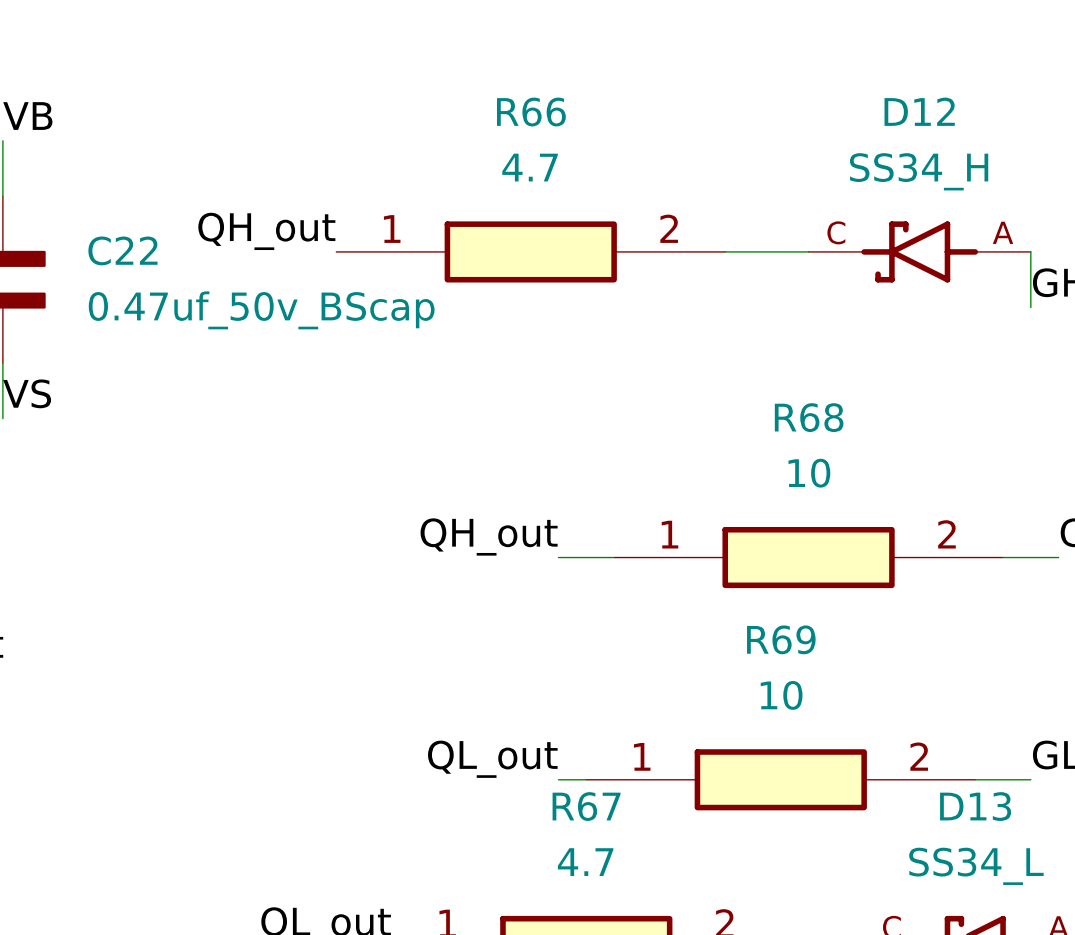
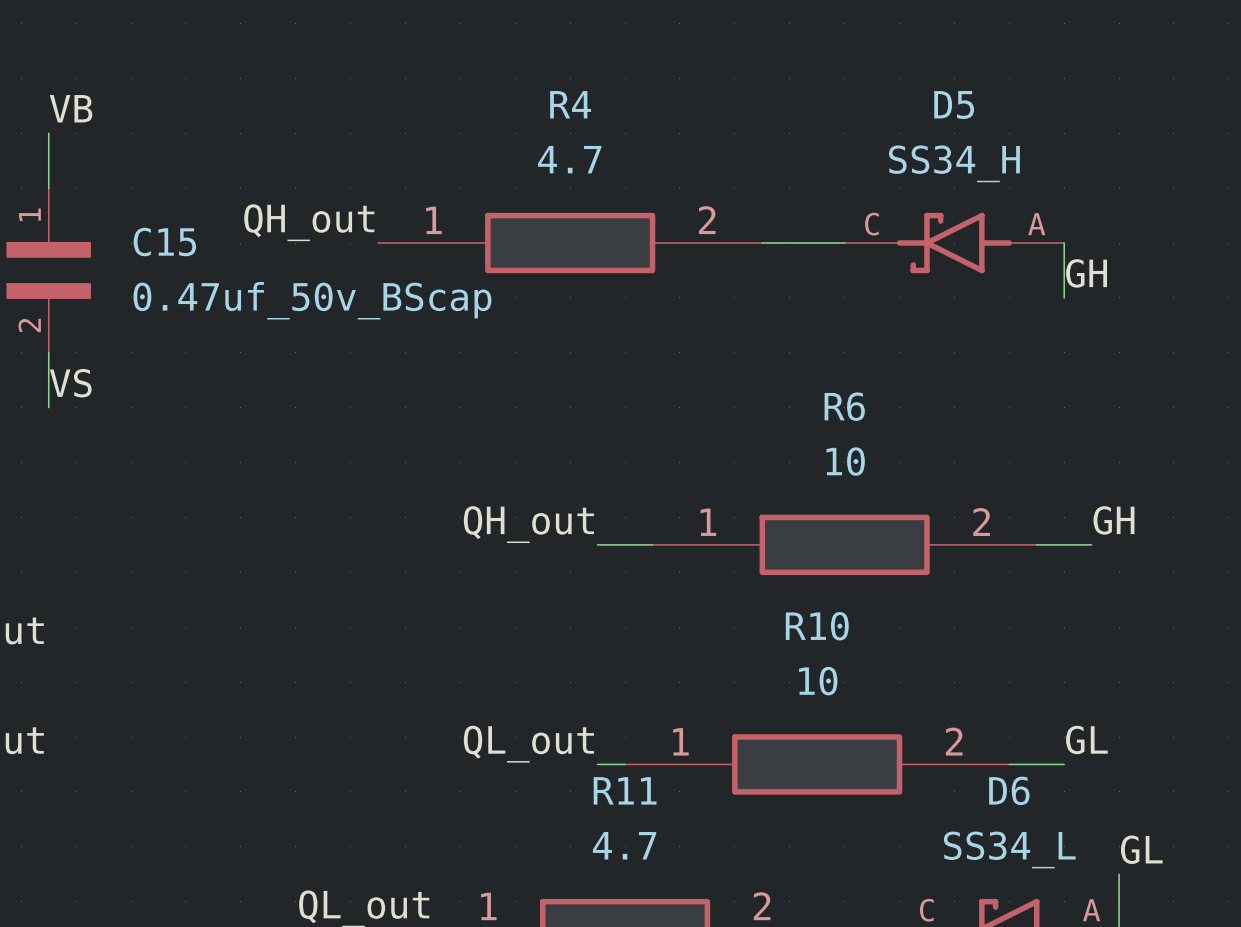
D12 name: D12 (919, 111) -> D5 (954, 105)
R66 name: R66 (531, 112) -> R4 (570, 104)
C22 name: C22 (122, 250) -> C15 (164, 242)
R68 name: R68 (809, 417) -> R6 (844, 406)
R69 name: R69 (781, 639) -> R10 (817, 626)
R67 name: R67 (586, 806) -> R11 (625, 790)
D13 name: D13 (975, 806) -> D6 (1009, 790)

